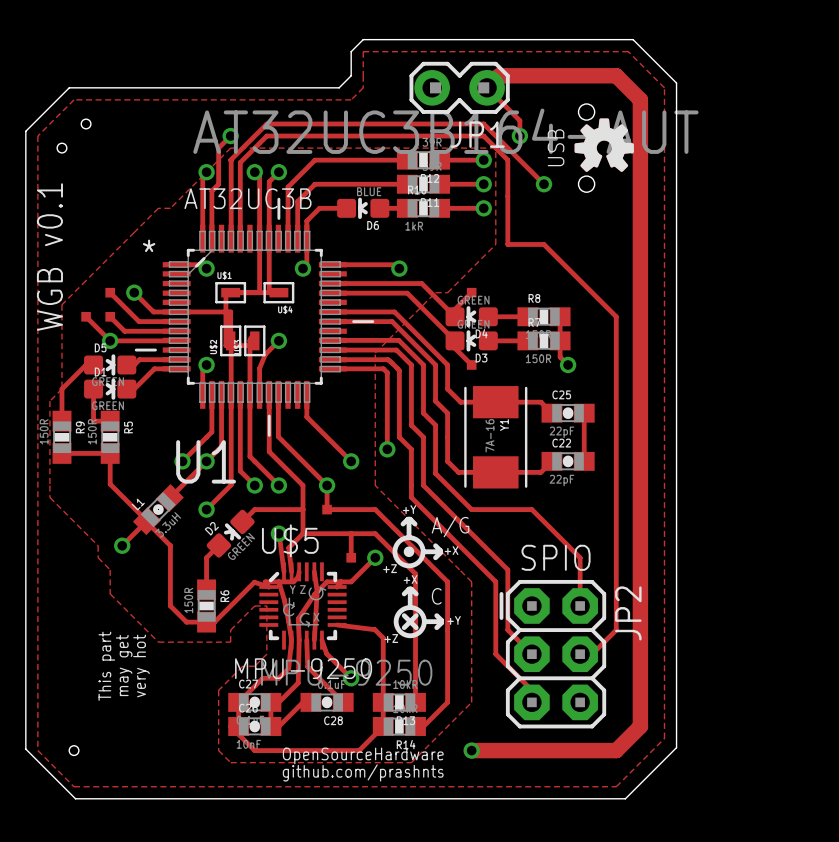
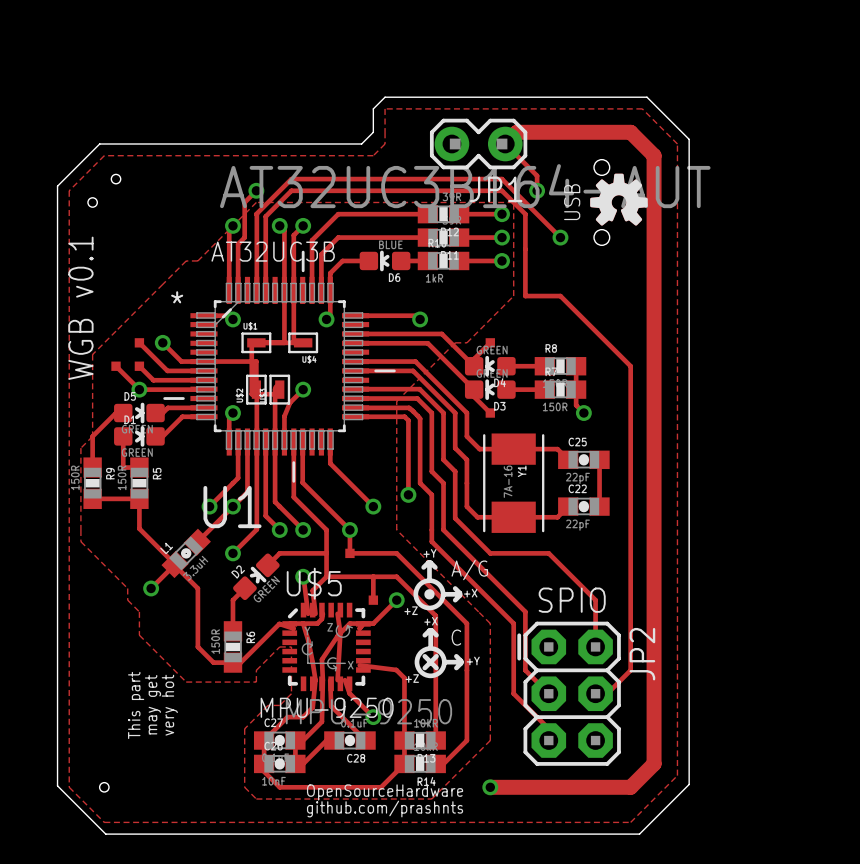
U$5 footprint: [259, 562, 347, 650] -> [282, 602, 371, 692]

